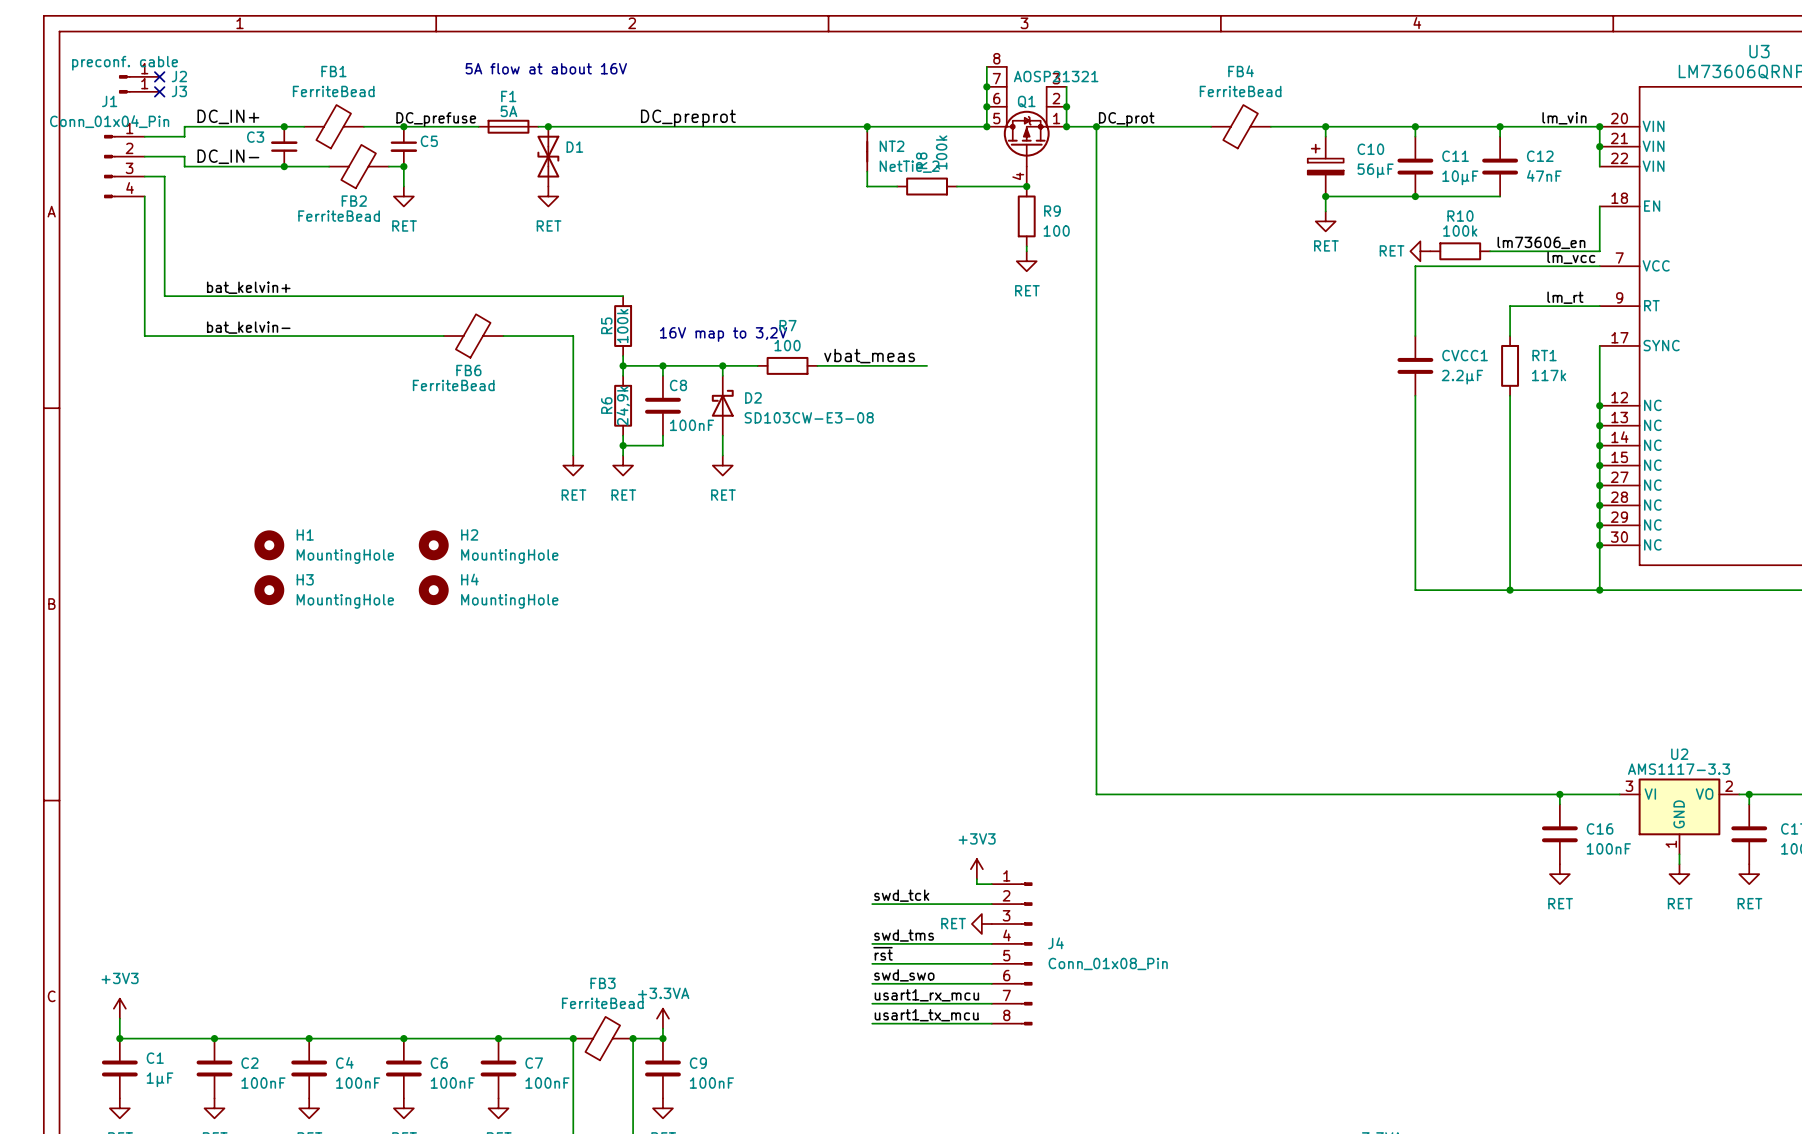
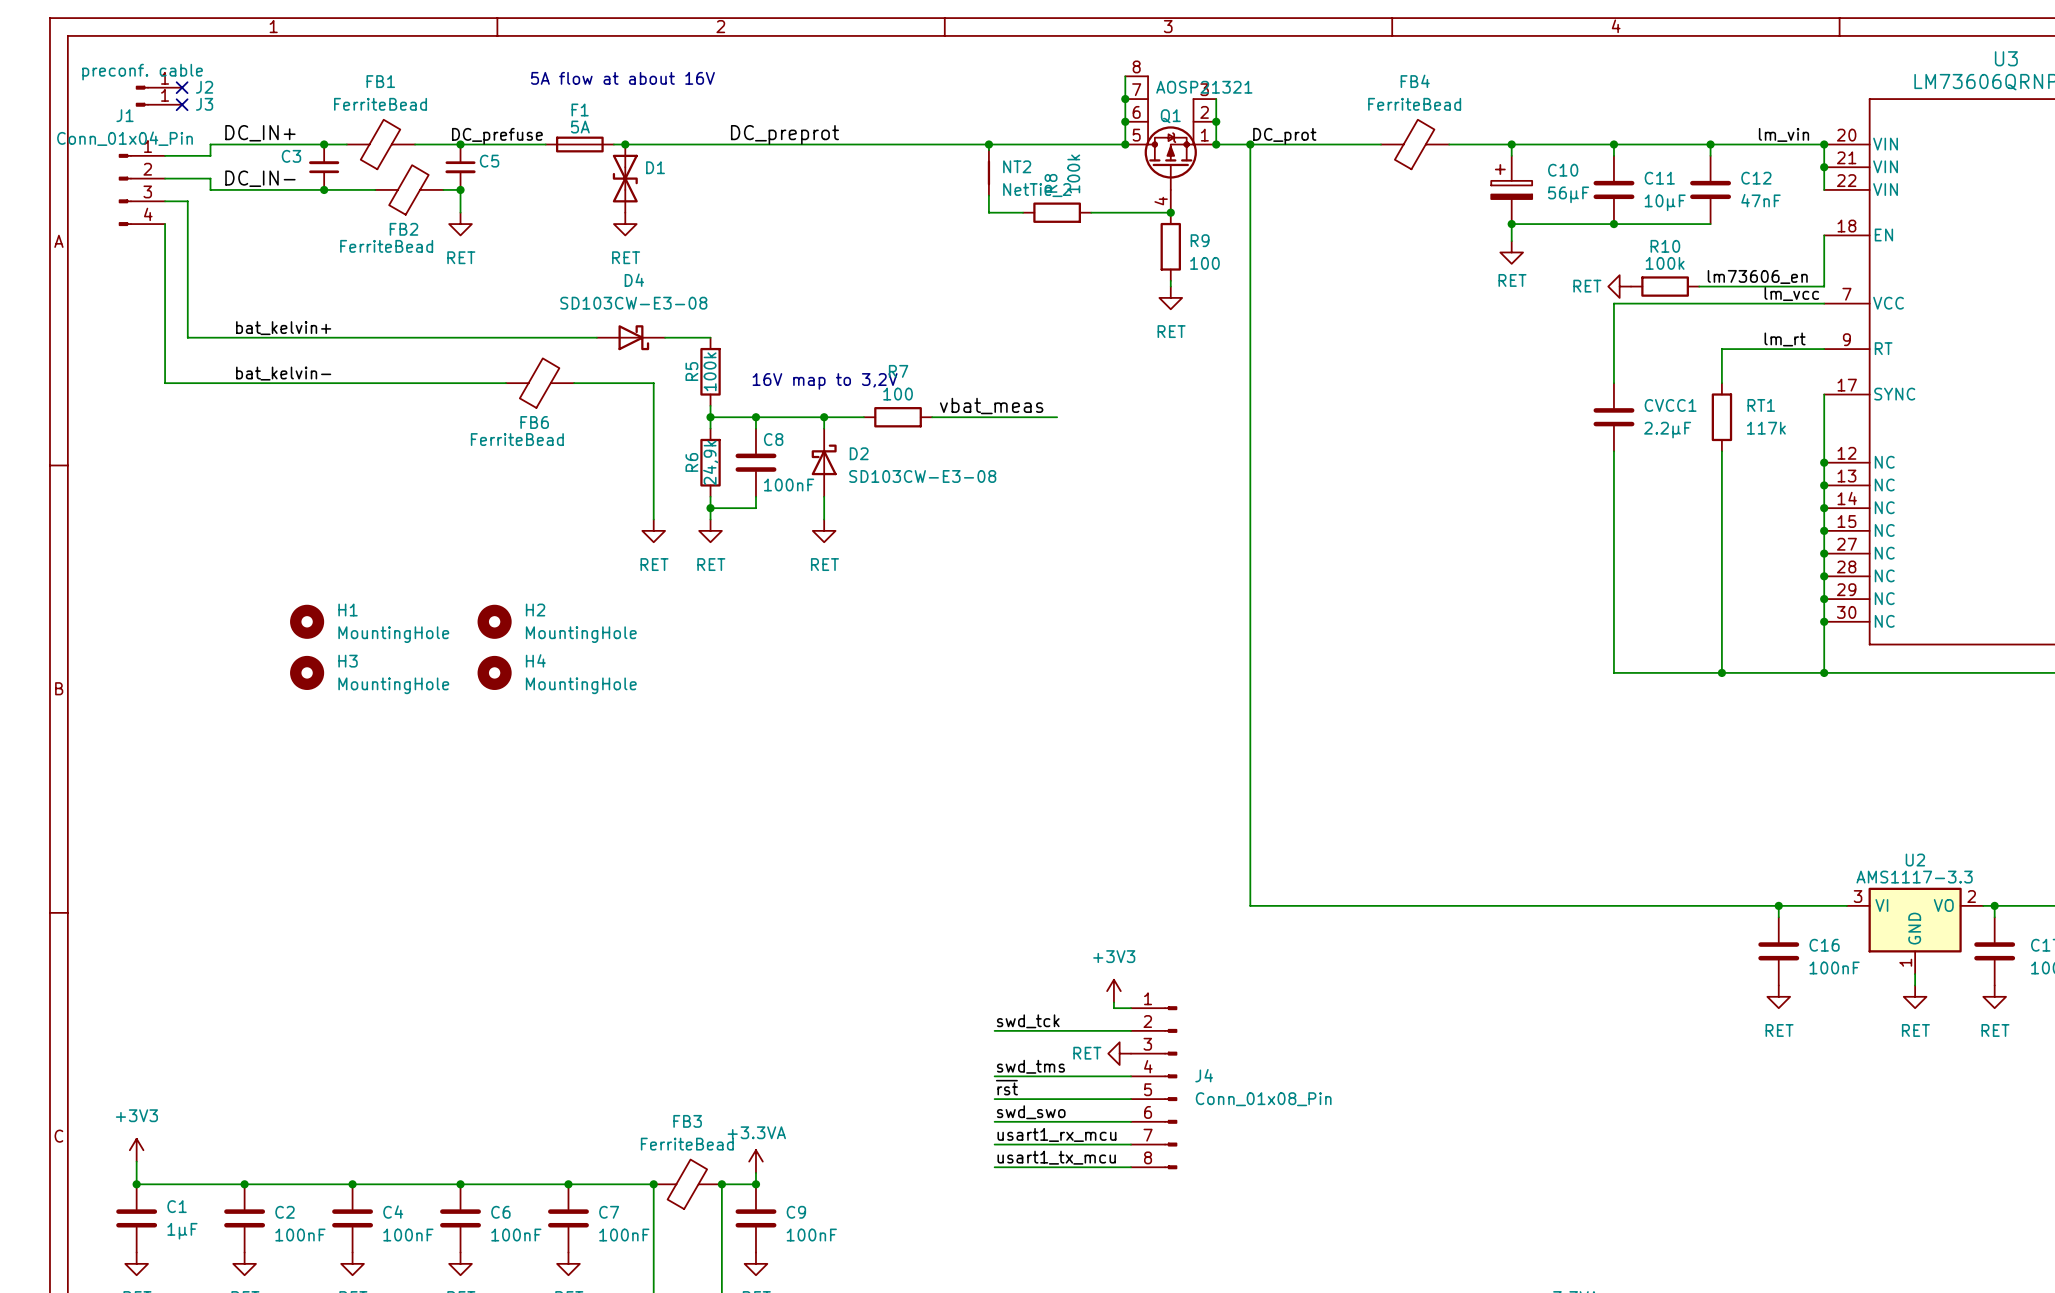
D4: none -> SD103CW-E3-08 (630, 337)

